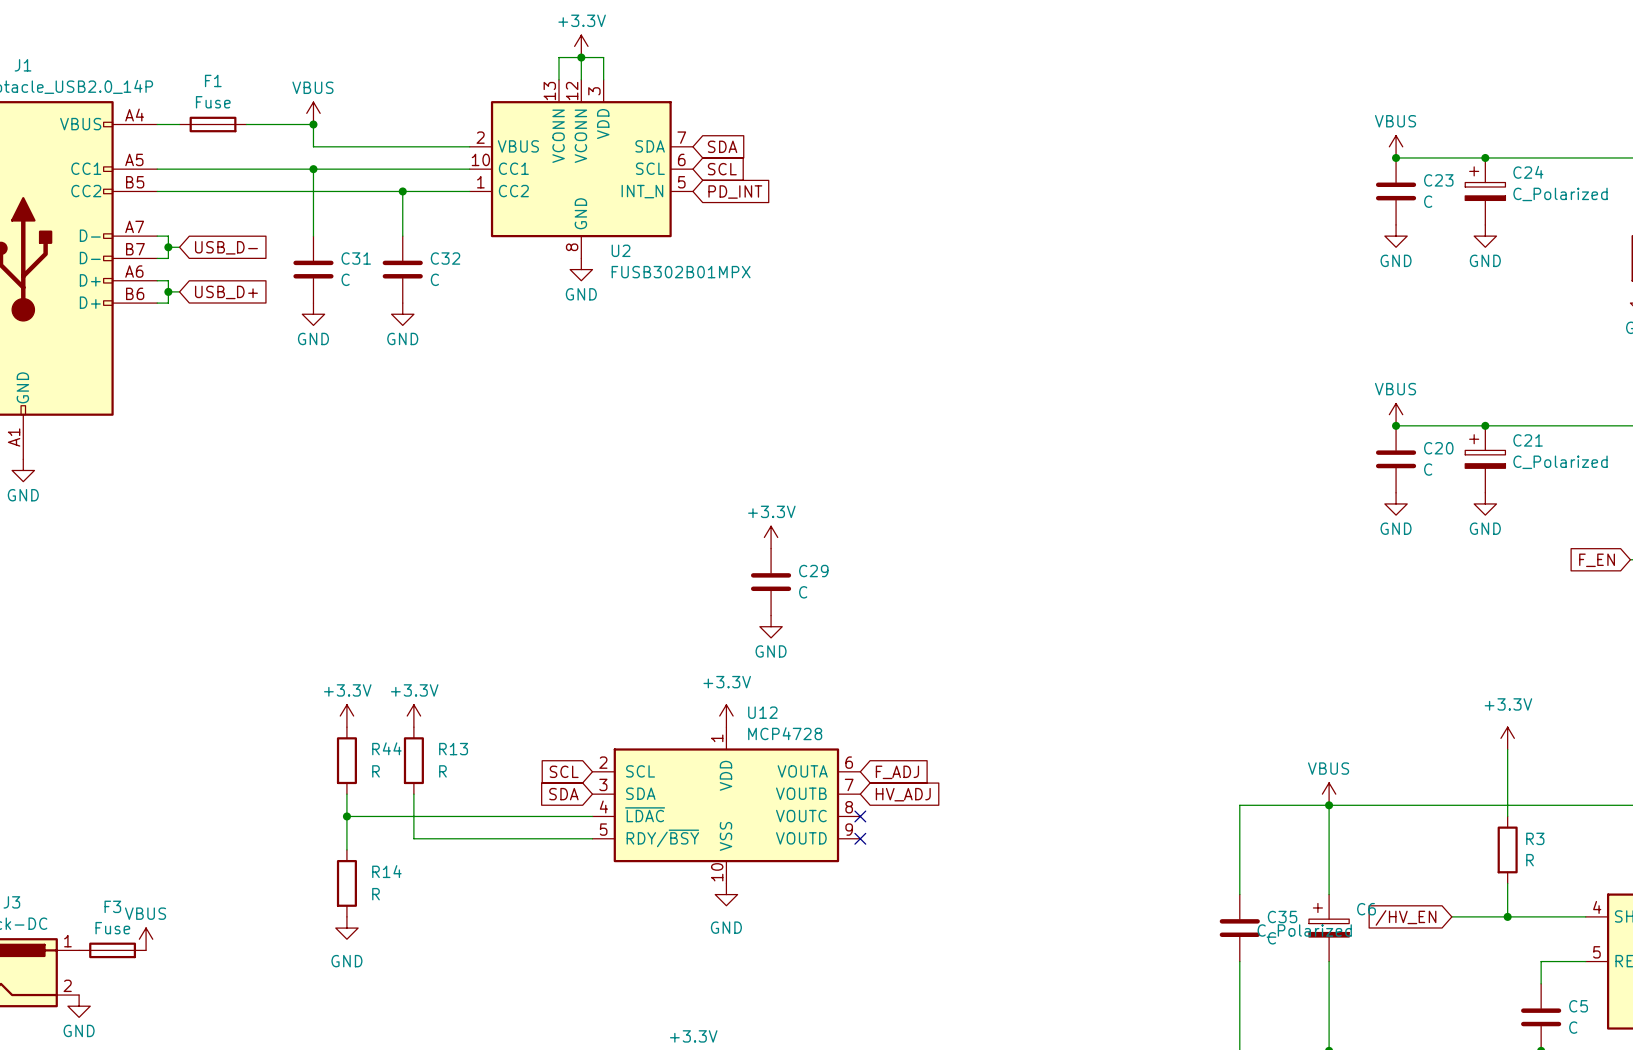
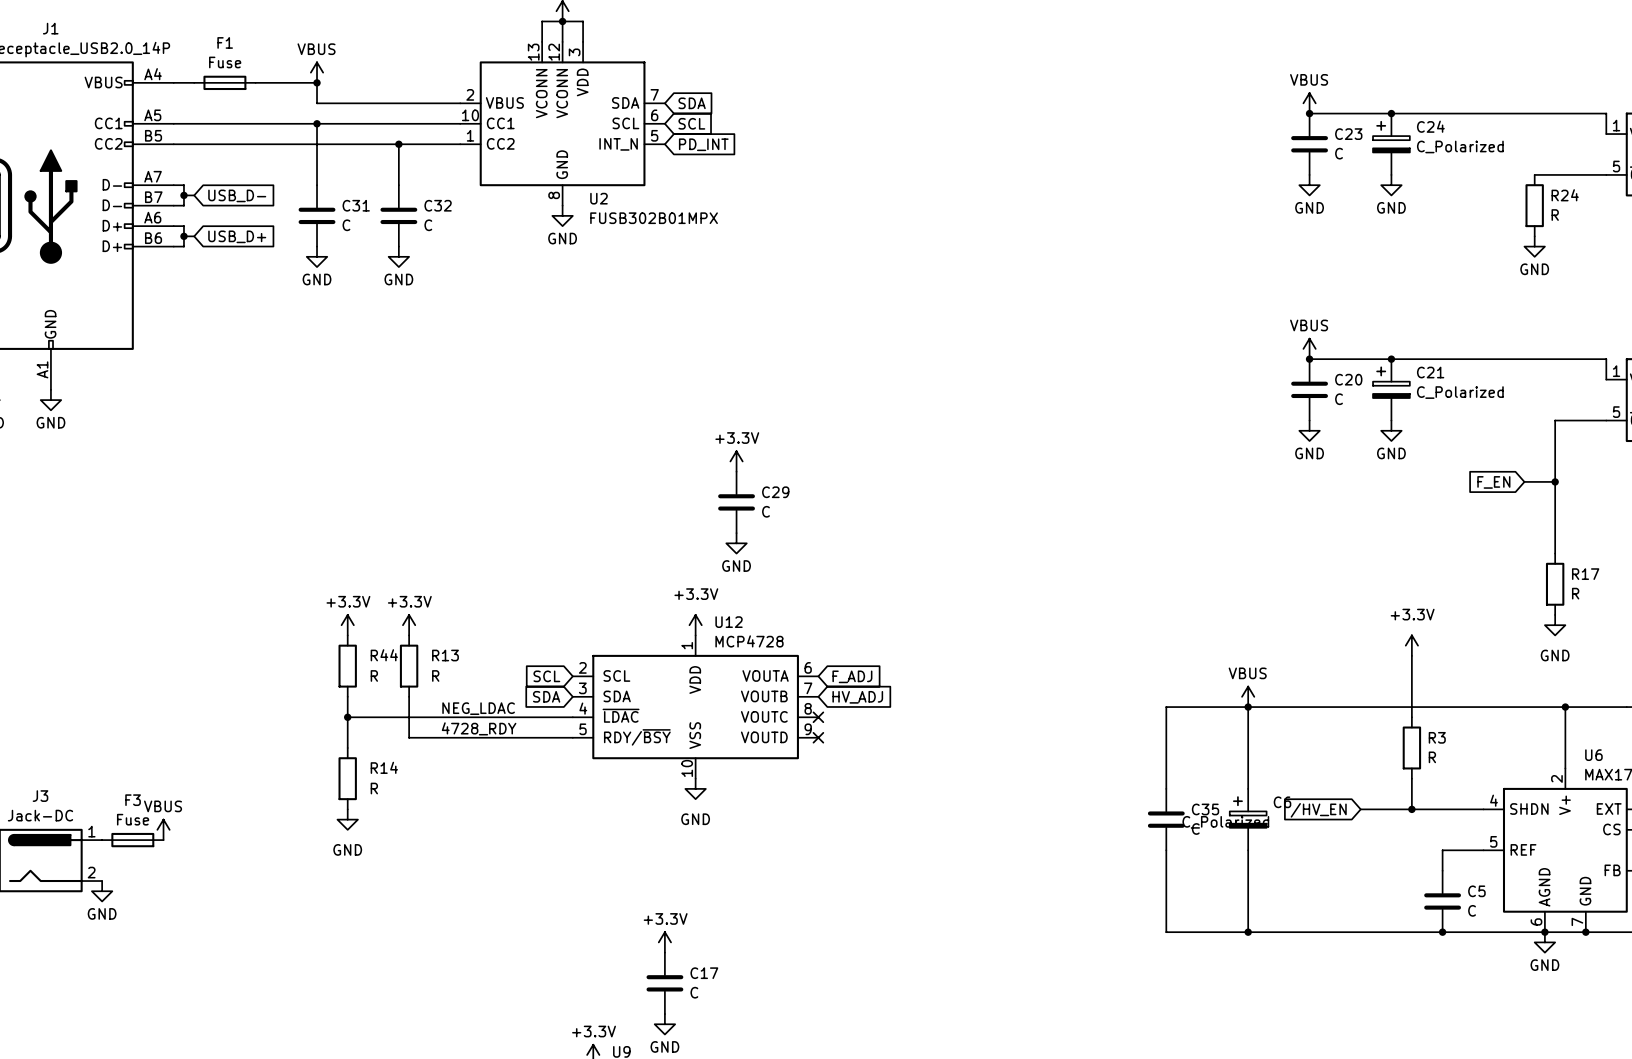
label: none -> NEG_LDAC (478, 708)
label: none -> 4728_RDY (479, 728)

